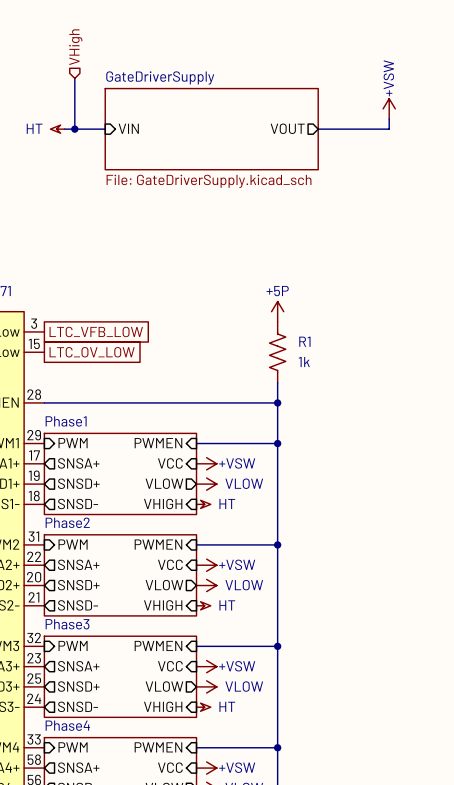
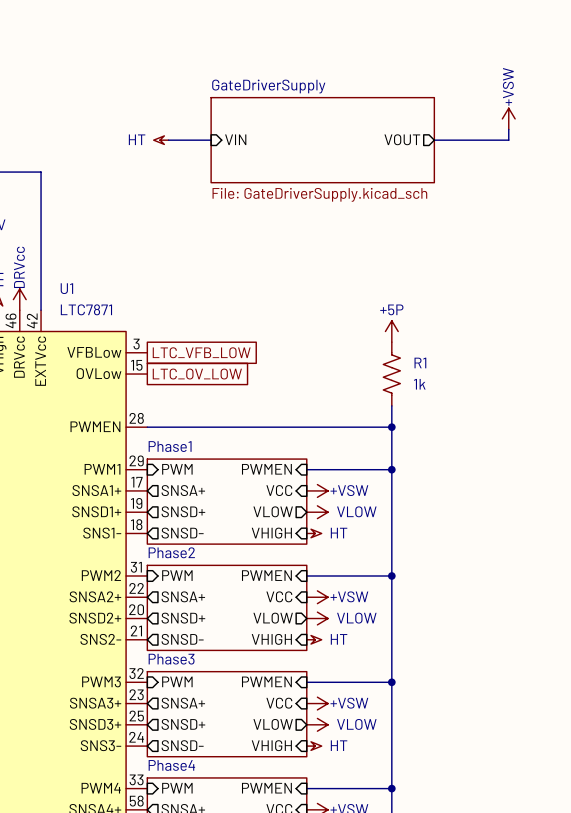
hierarchical label: VHigh (75, 47) -> none
wire: (74, 78) (74, 129) -> none
junction: (74, 129) -> none

